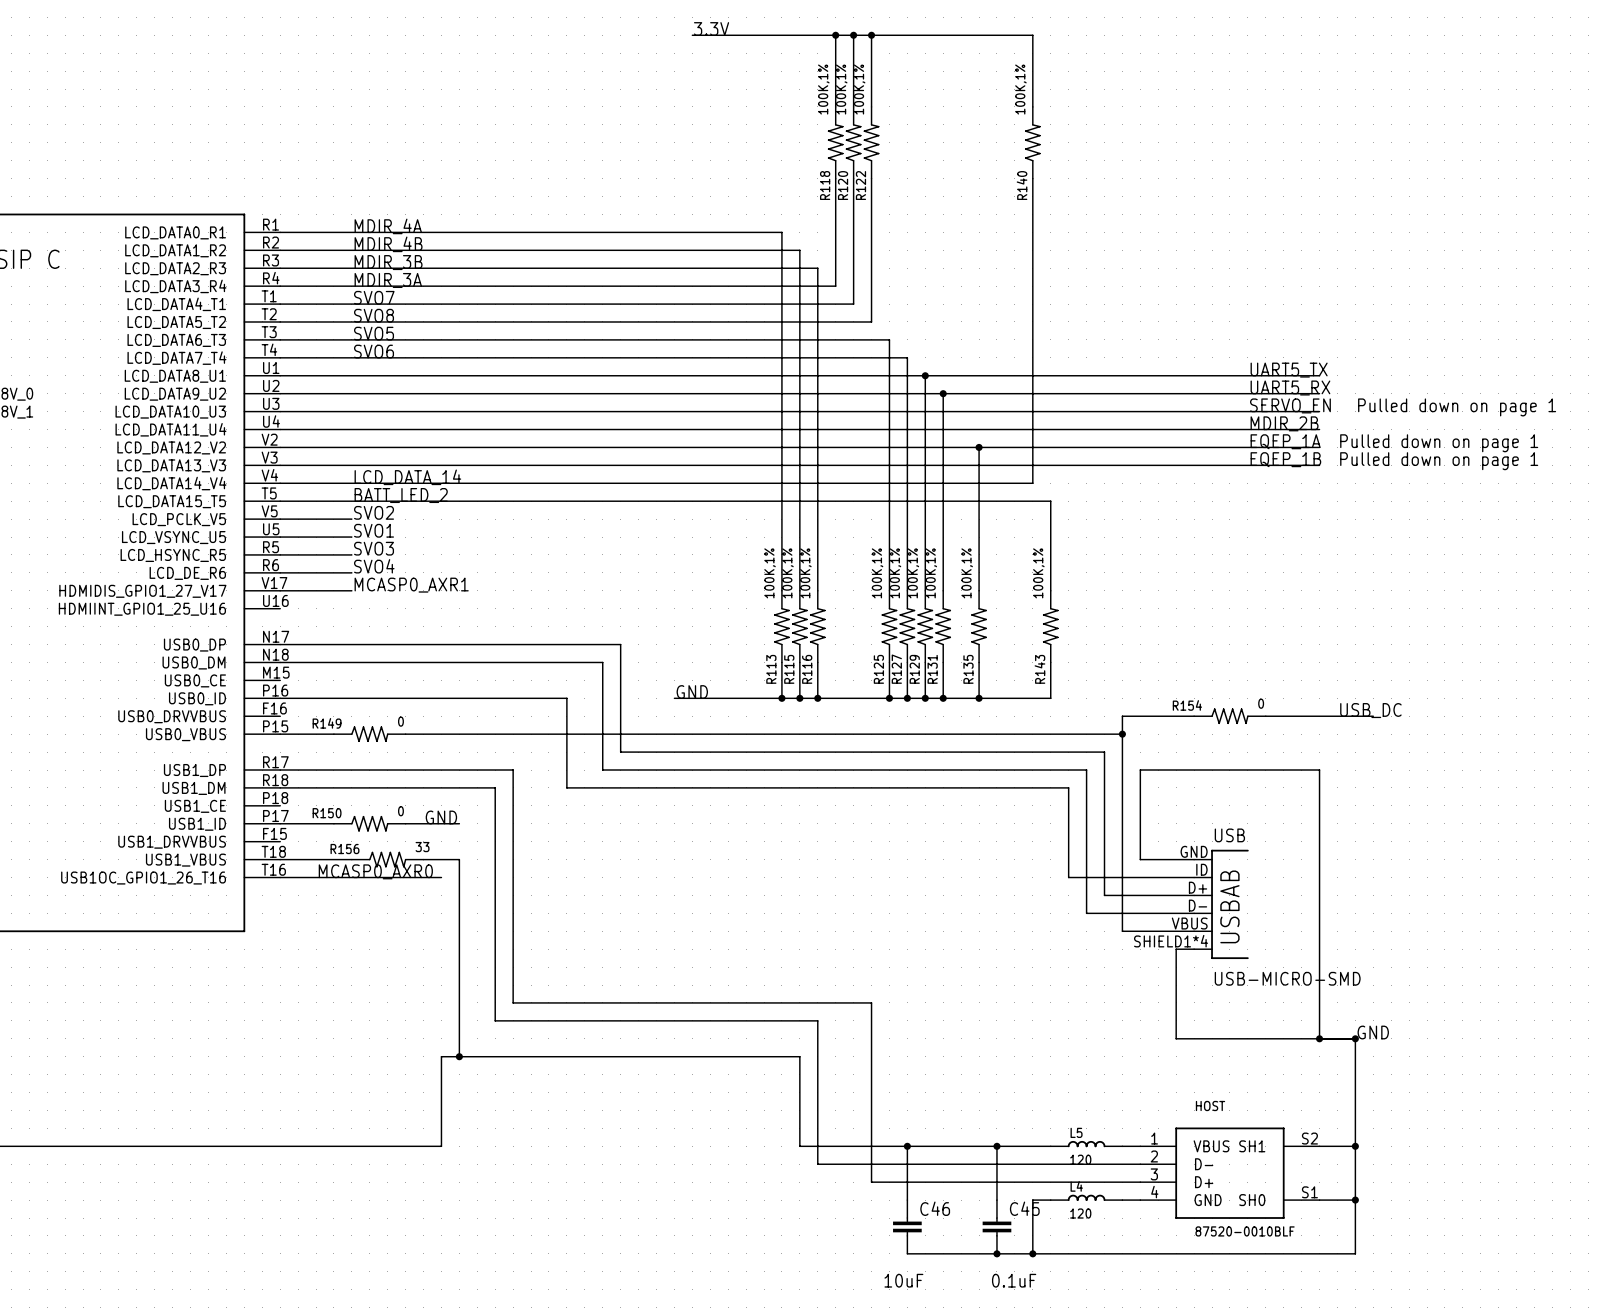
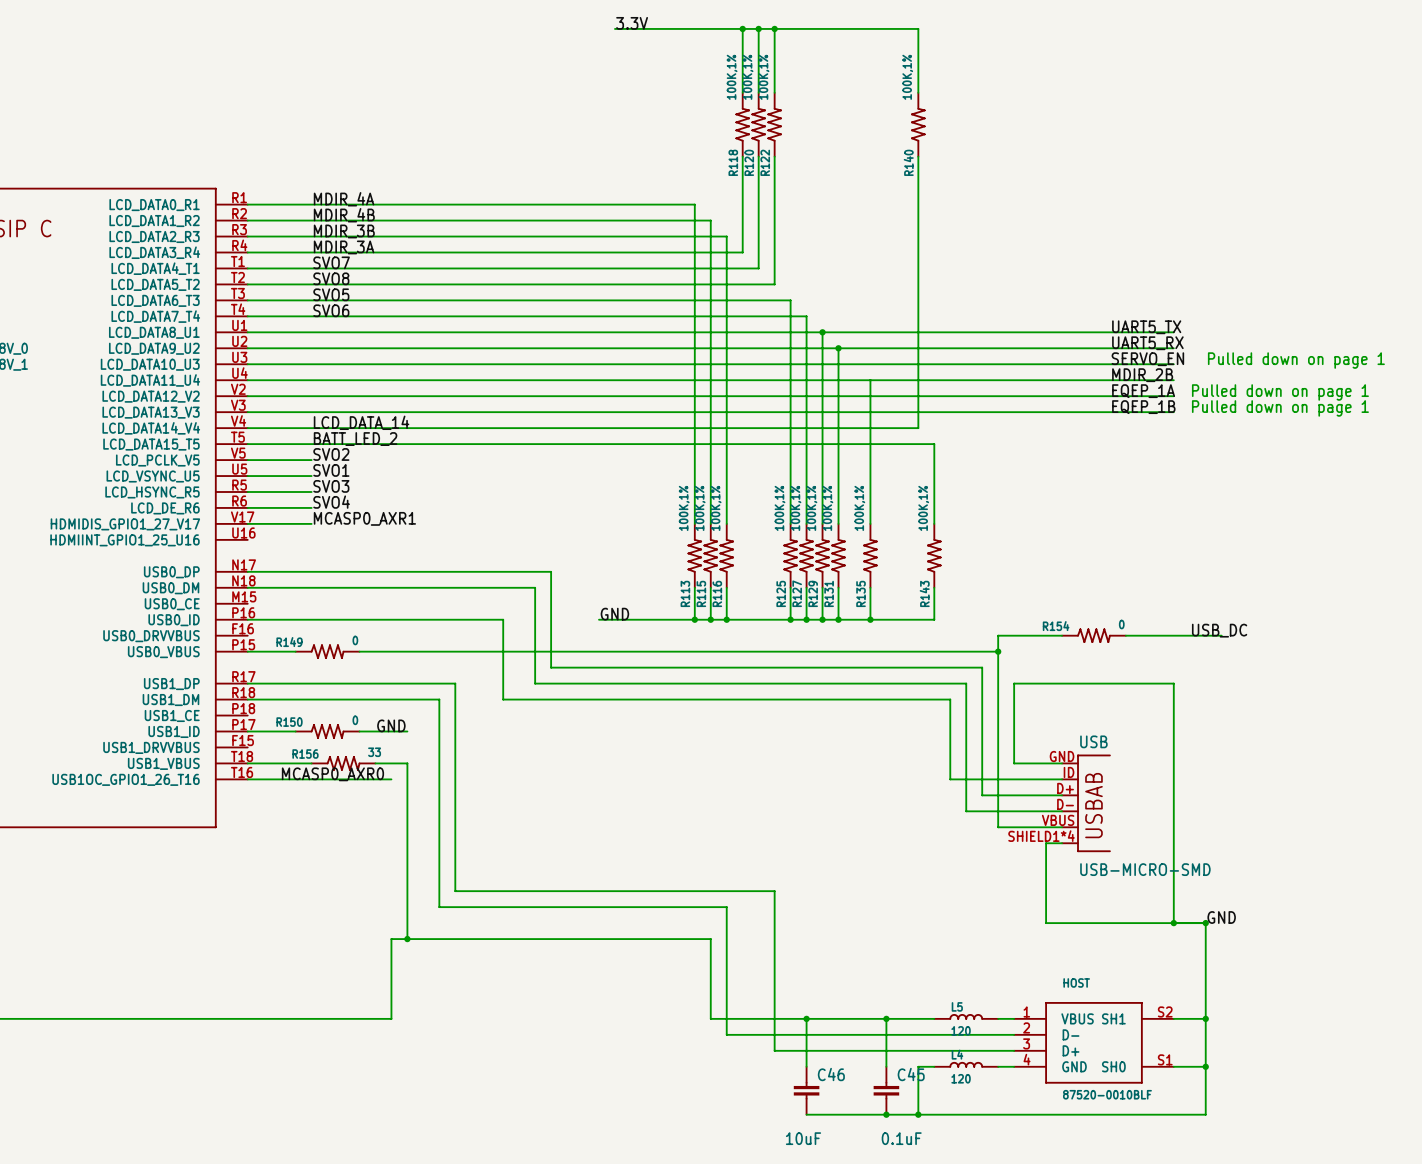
wire: none -> (870, 380) (870, 396)
junction: (979, 447) -> none

